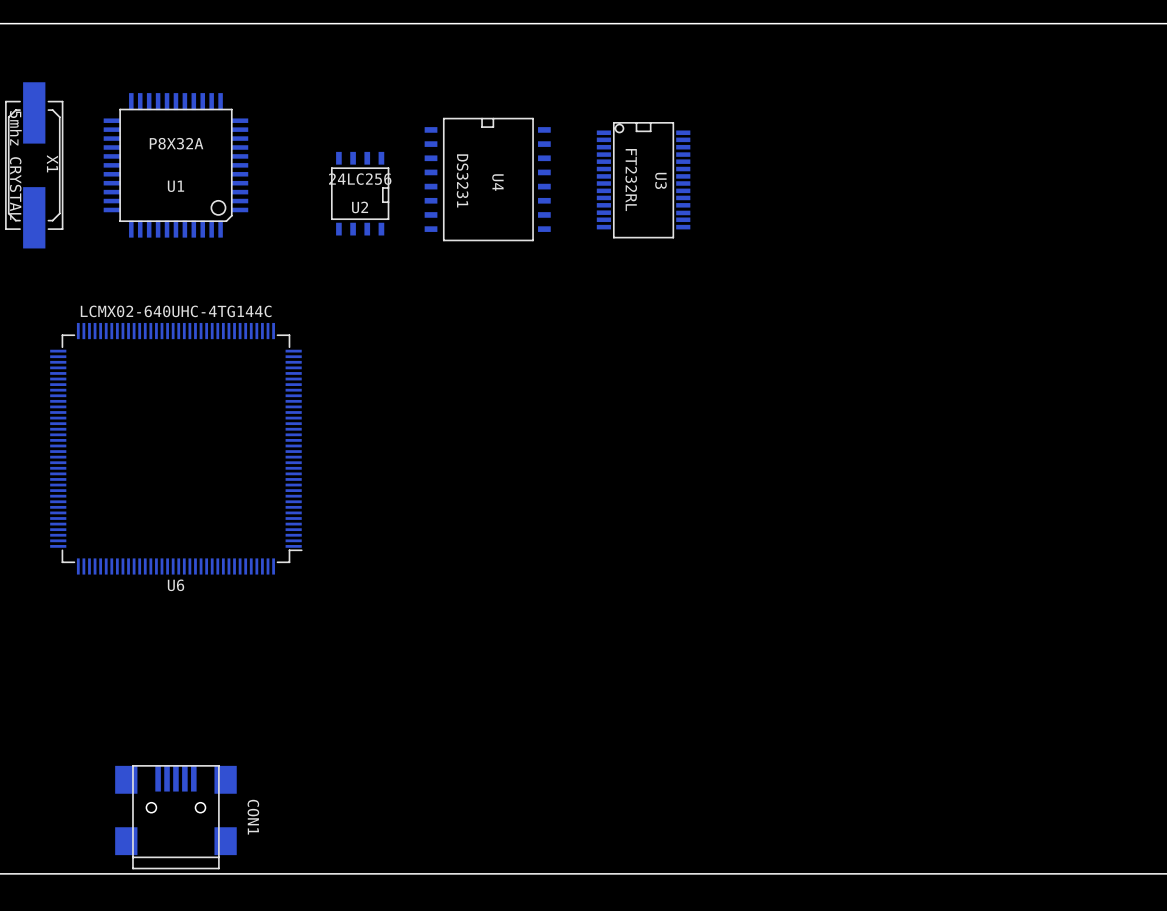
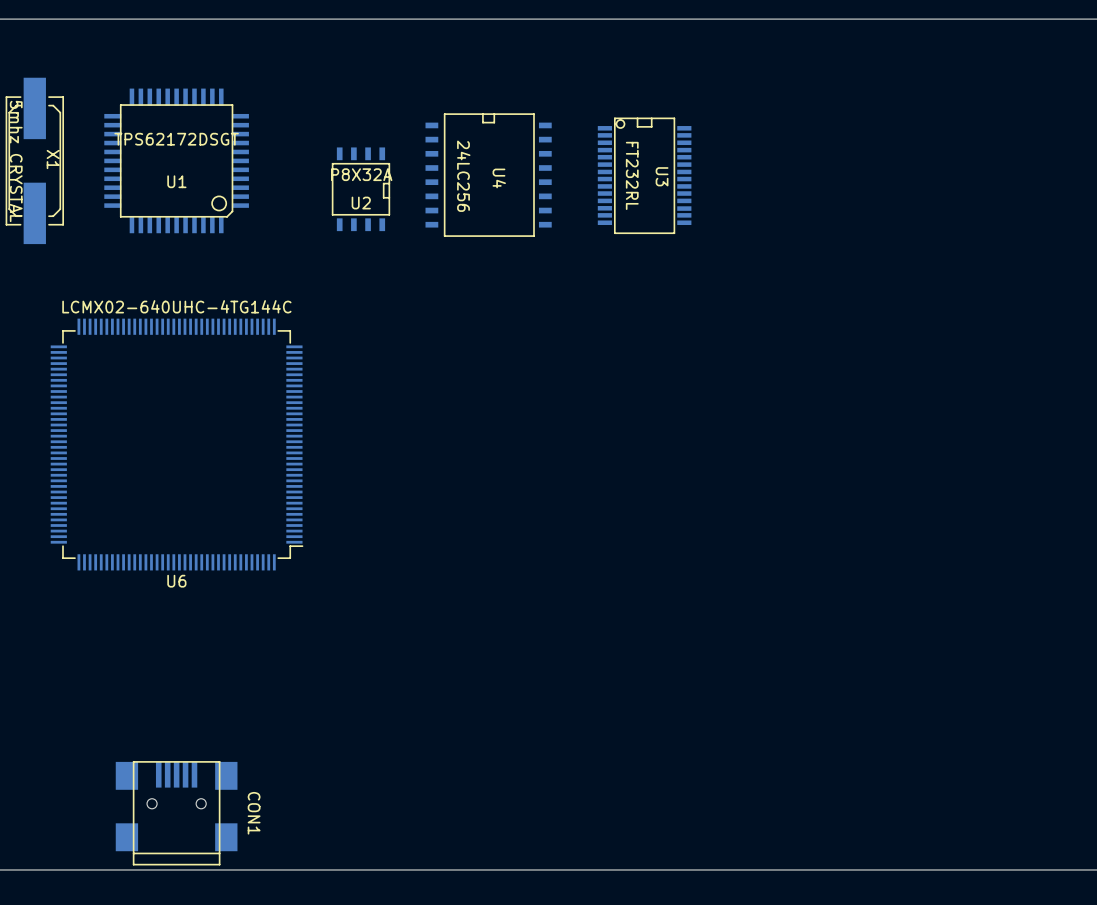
U1 value: P8X32A (176, 143) -> TPS62172DSGT (176, 139)
U2 value: 24LC256 (360, 179) -> P8X32A (361, 174)
U4 value: DS3231 (462, 180) -> 24LC256 (463, 176)

